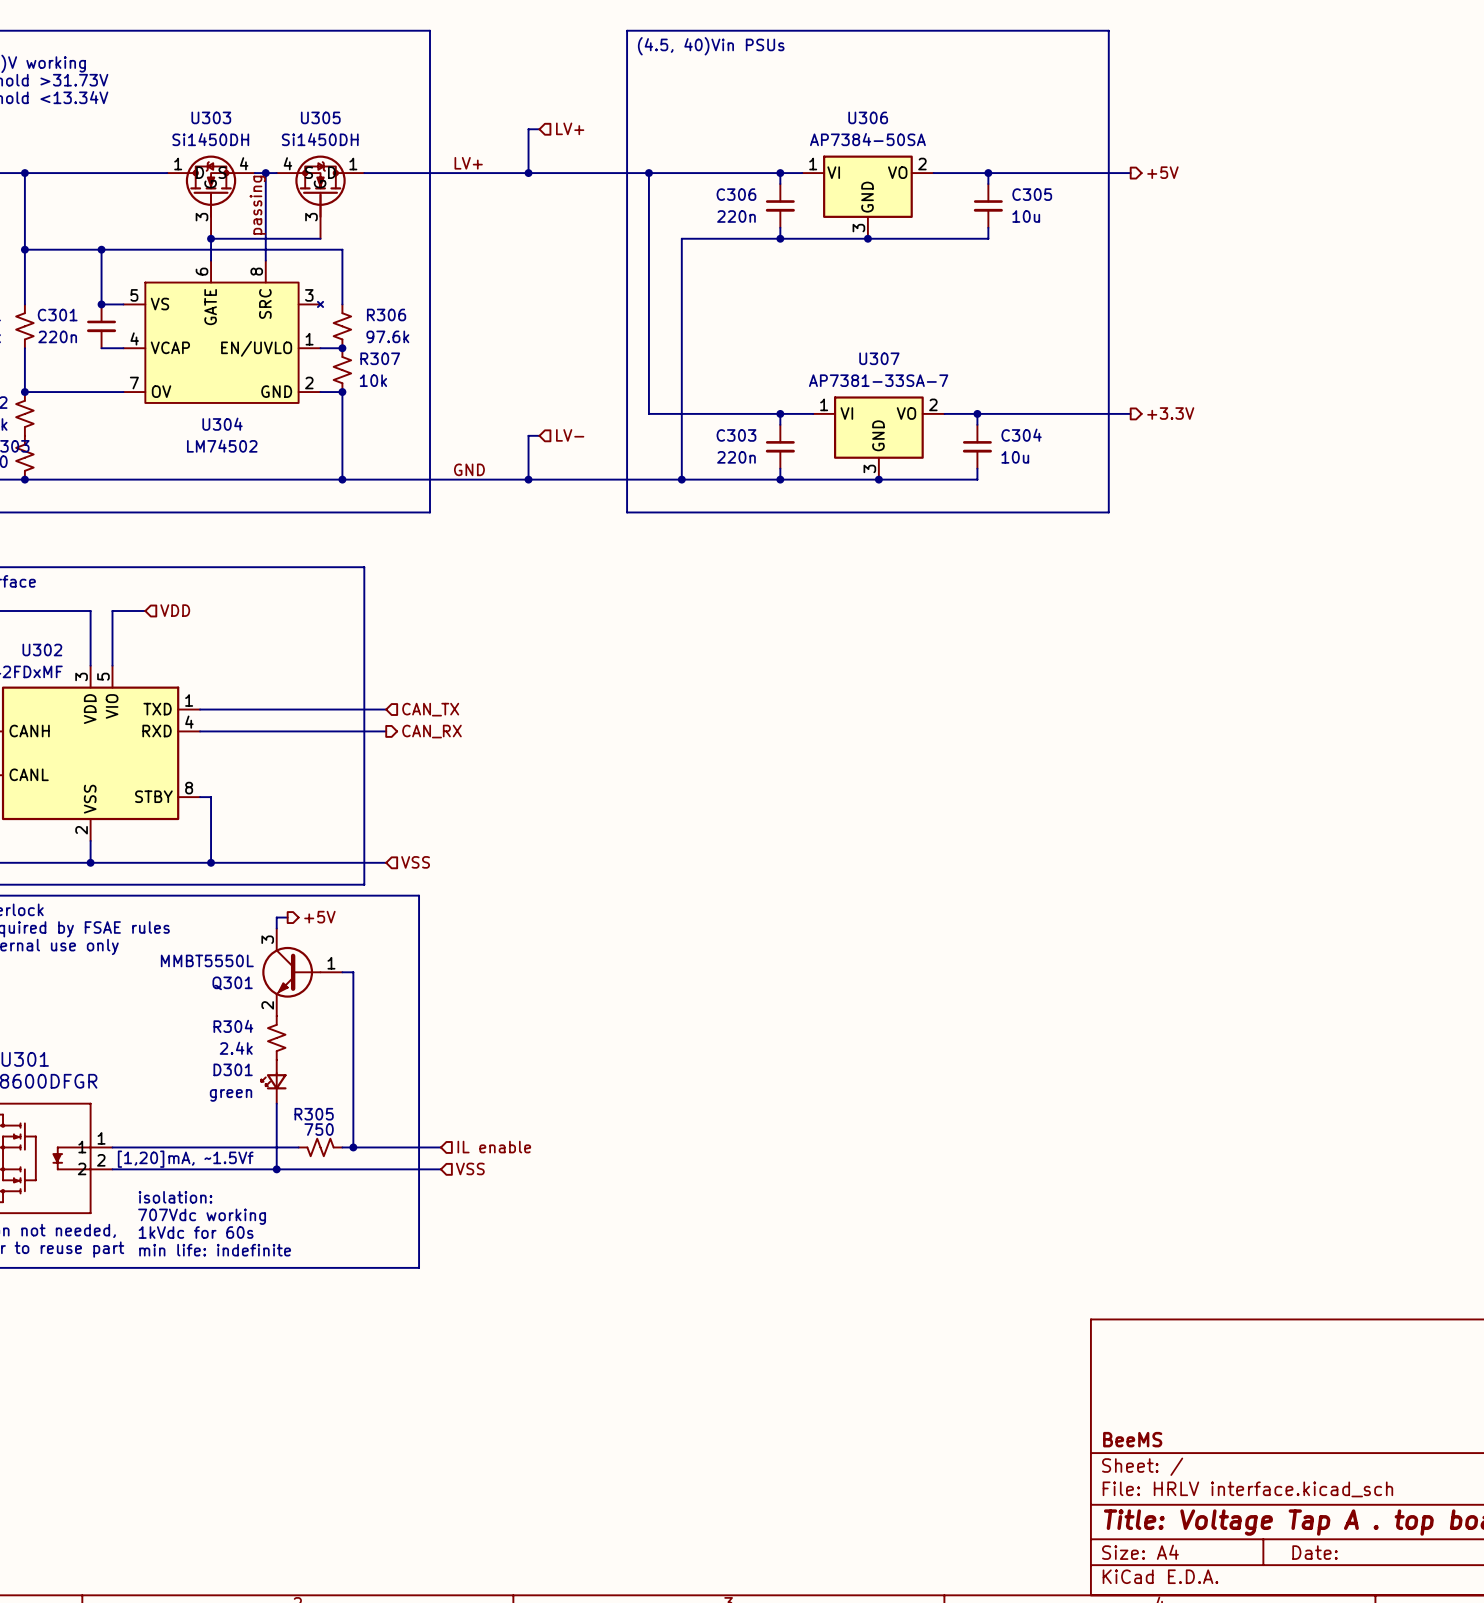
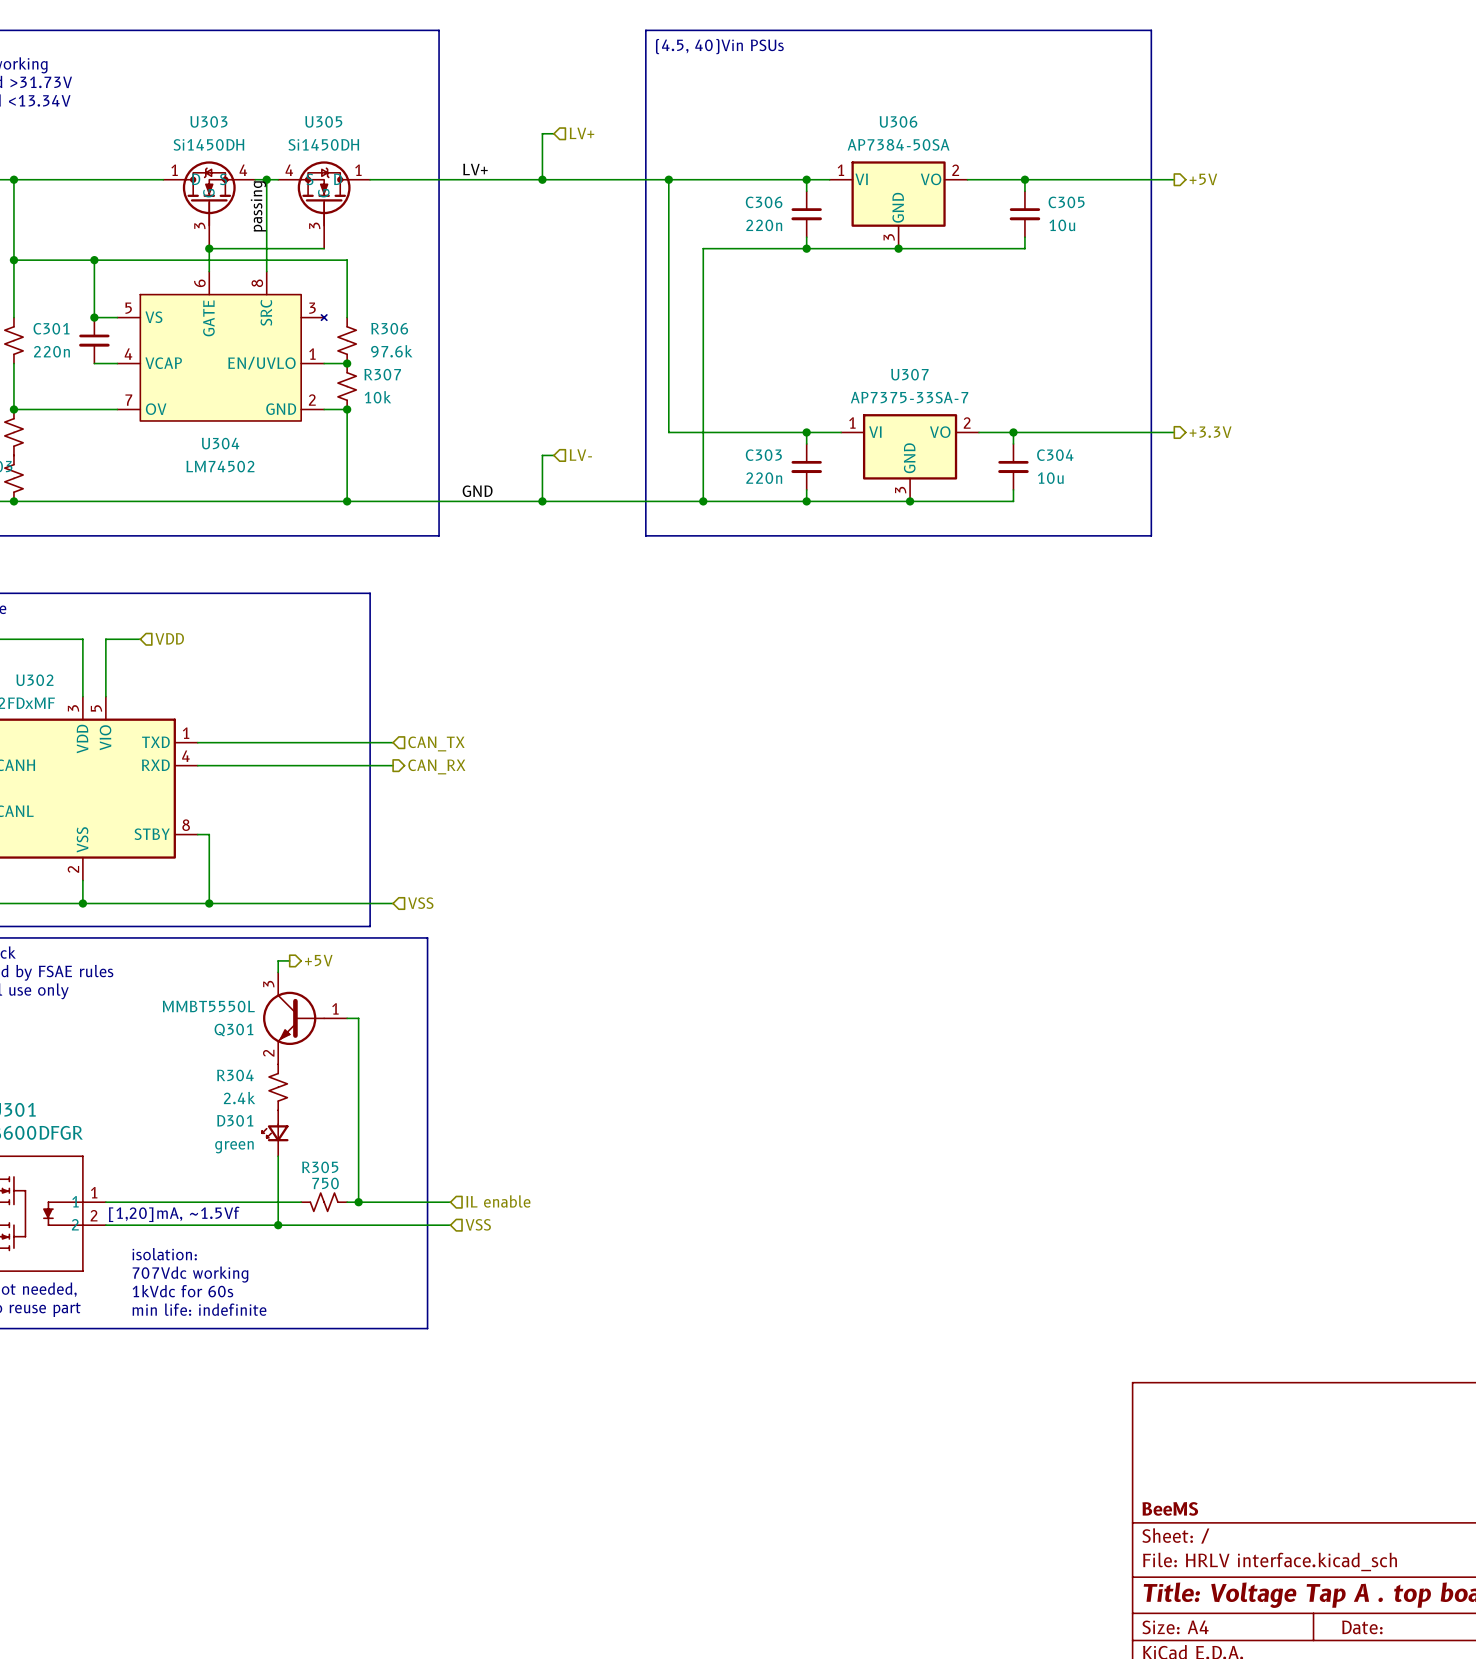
U307 value: AP7381-33SA-7 (878, 380) -> AP7375-33SA-7 (909, 397)

